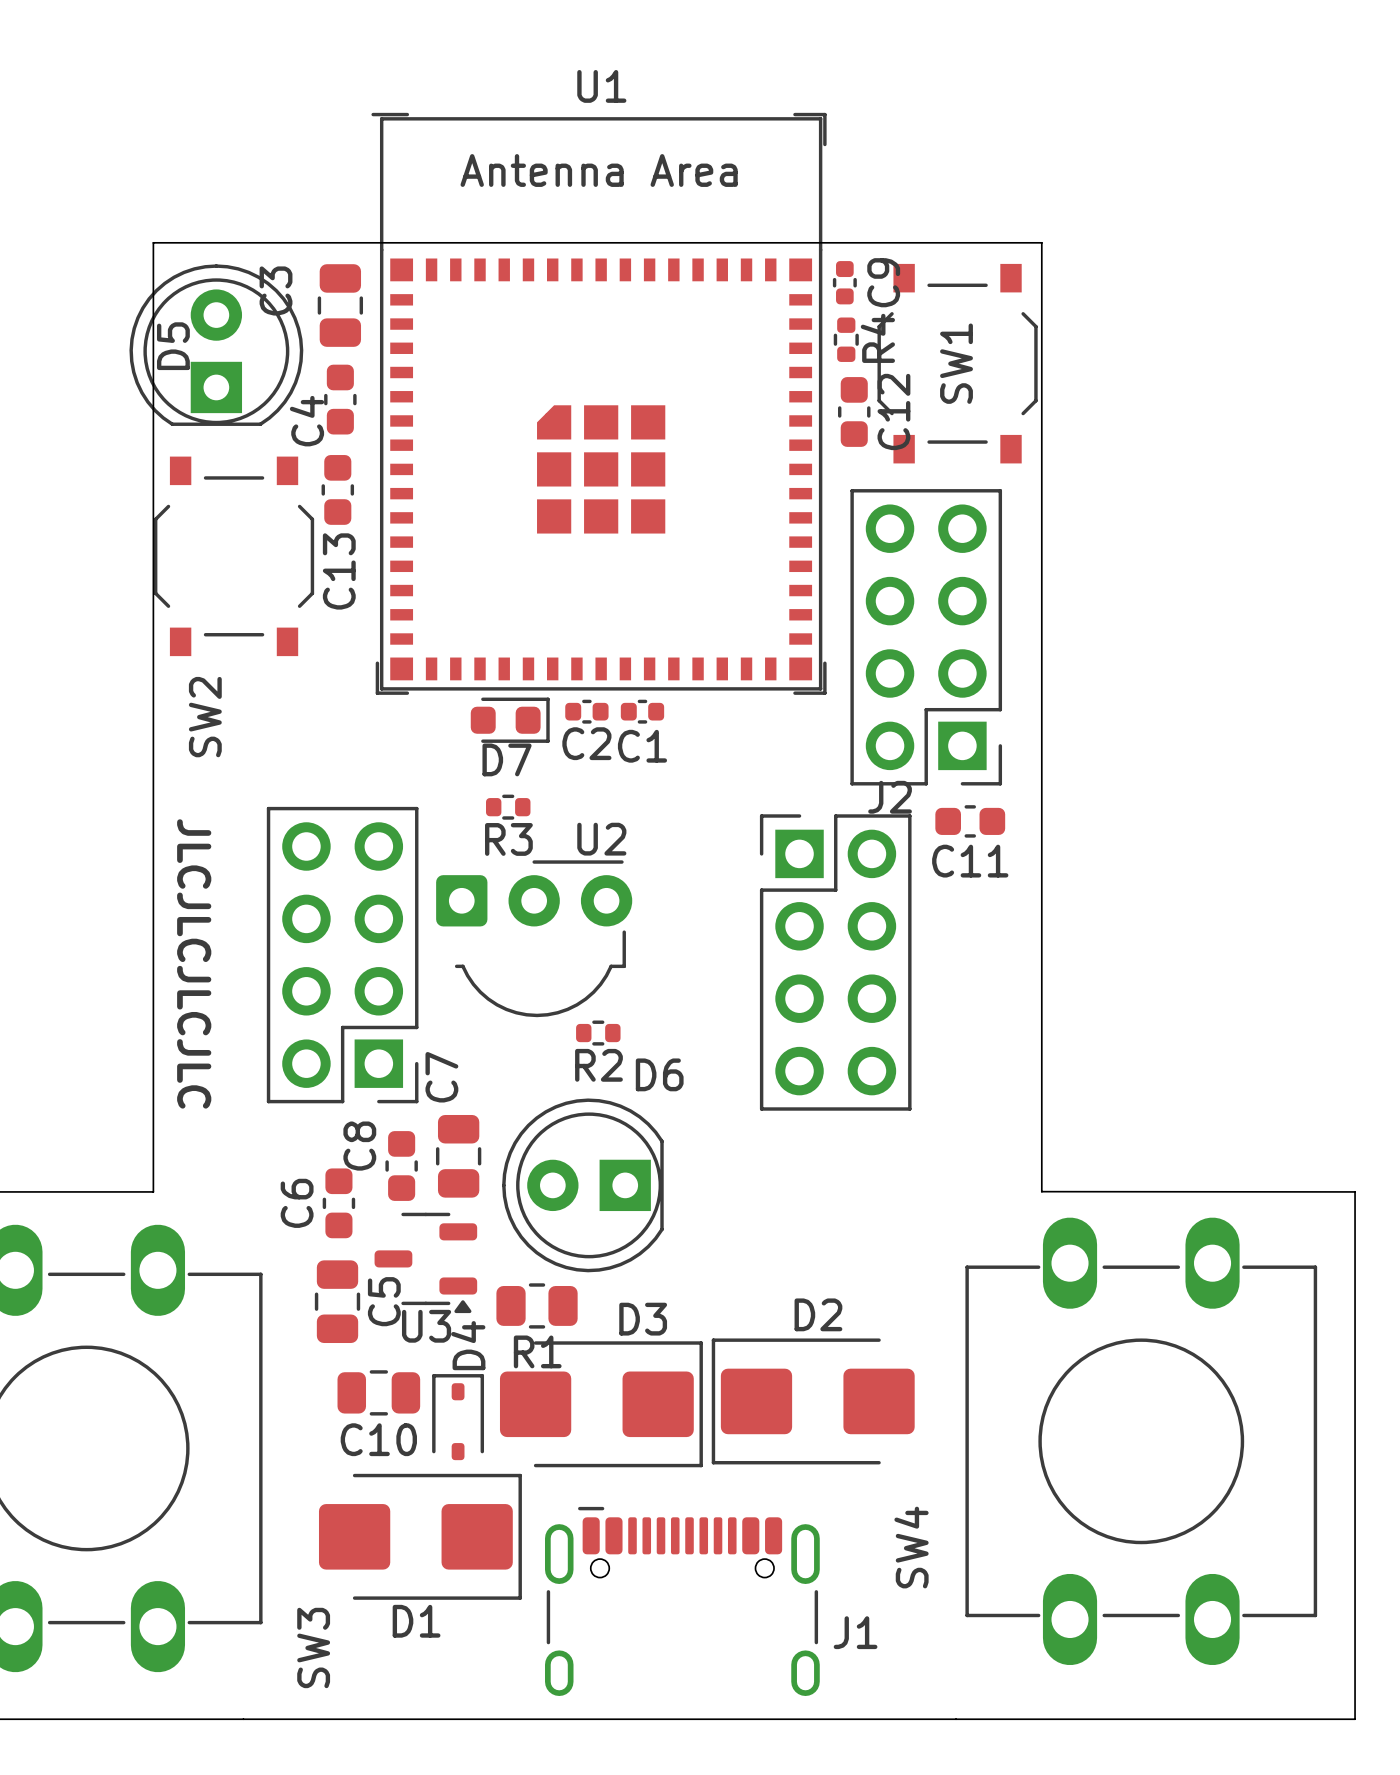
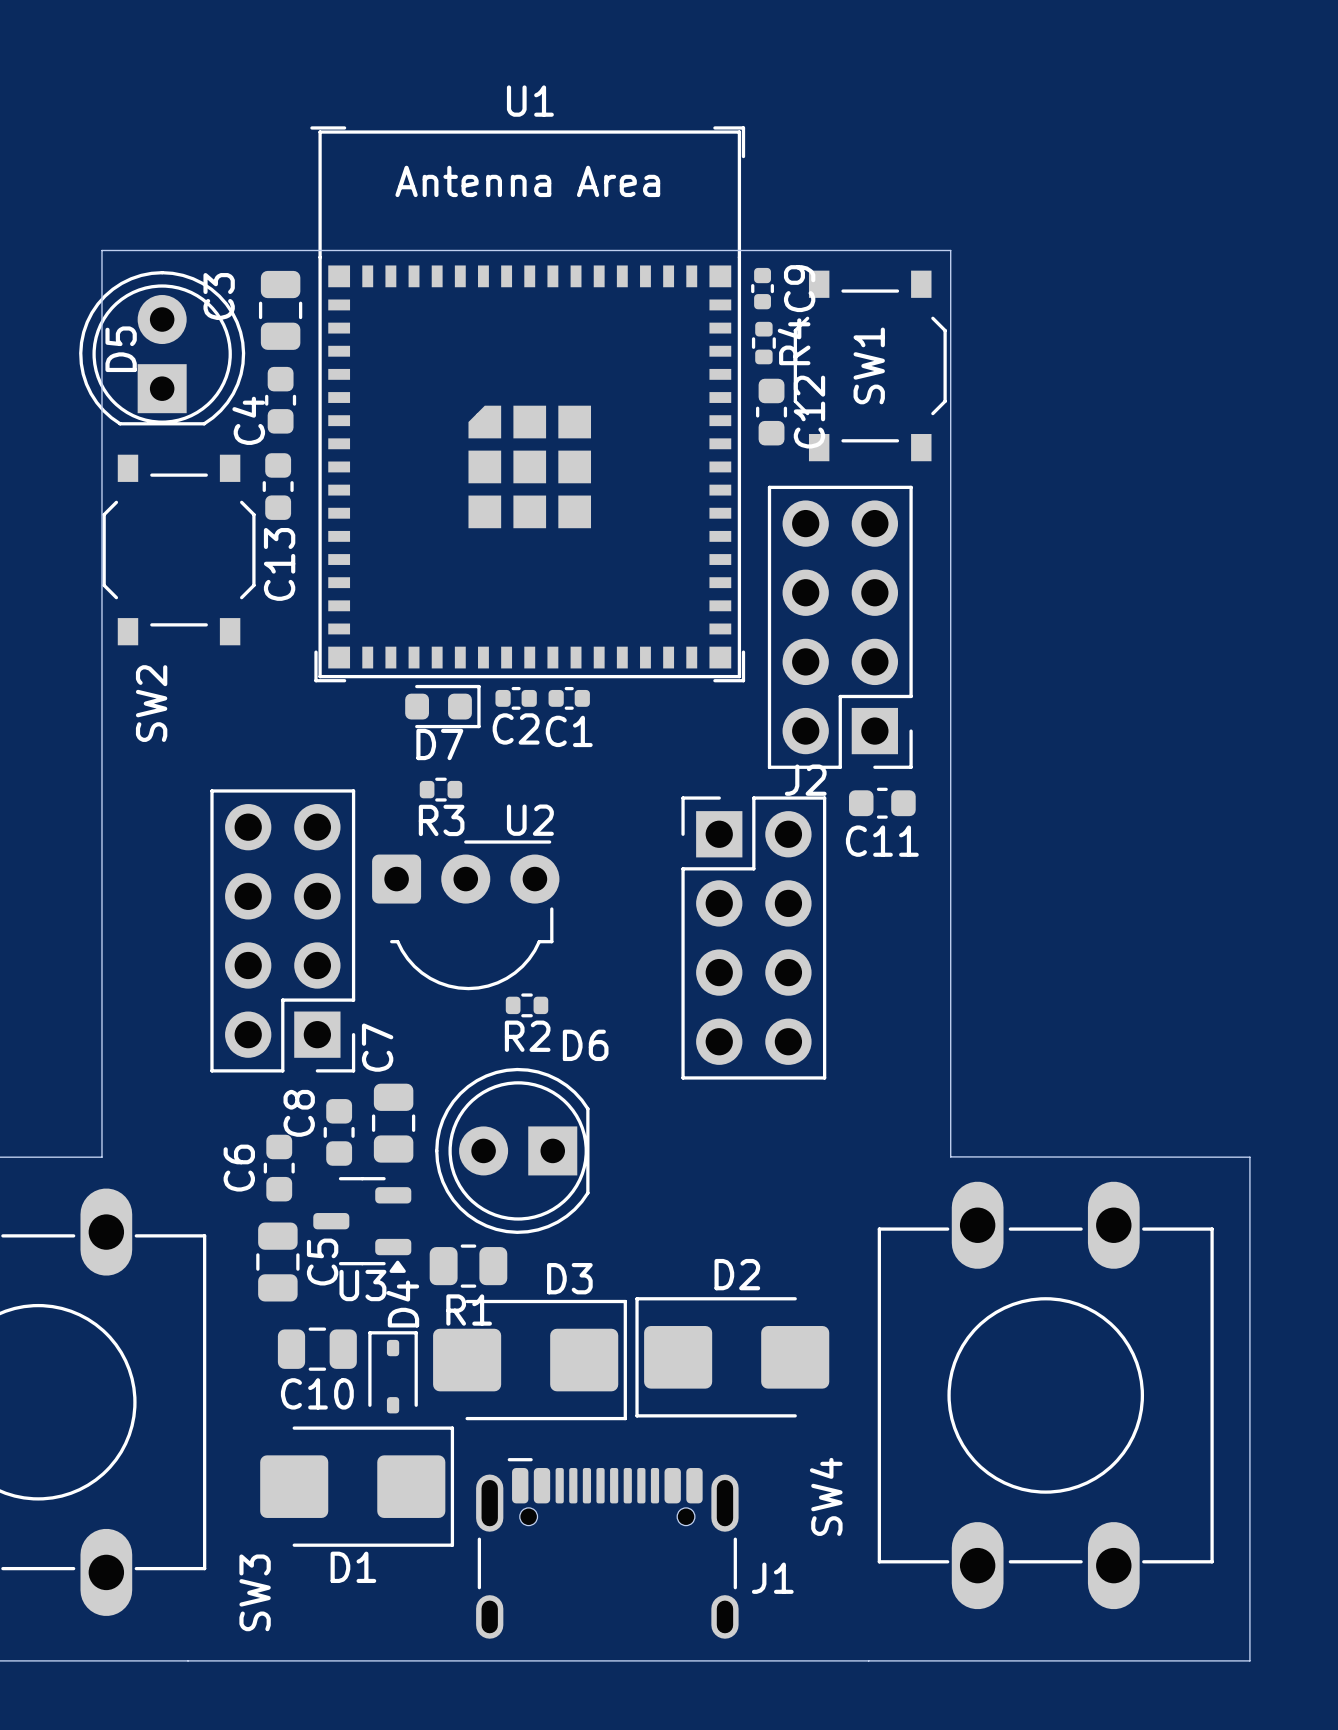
text: JLCJLCJLCJLC (194, 963) -> none

